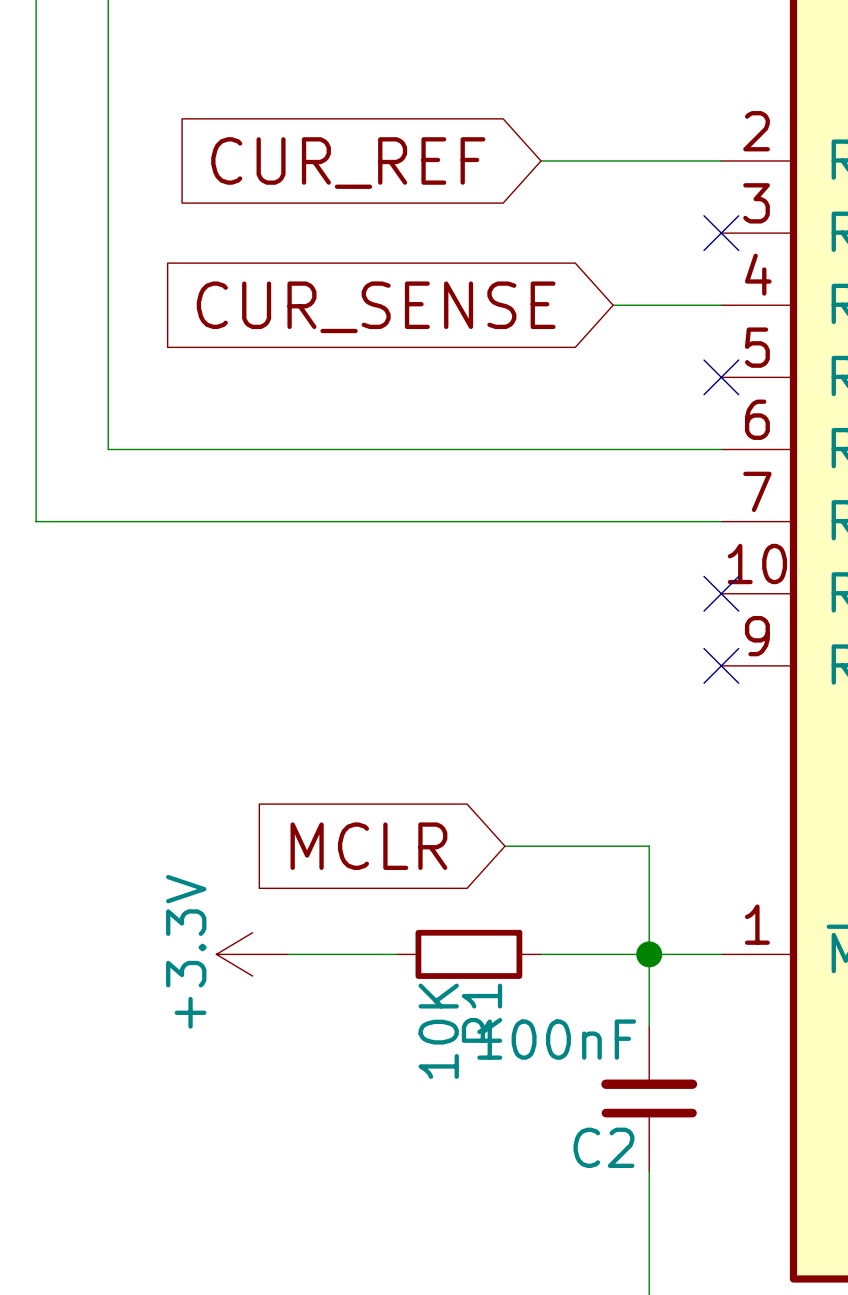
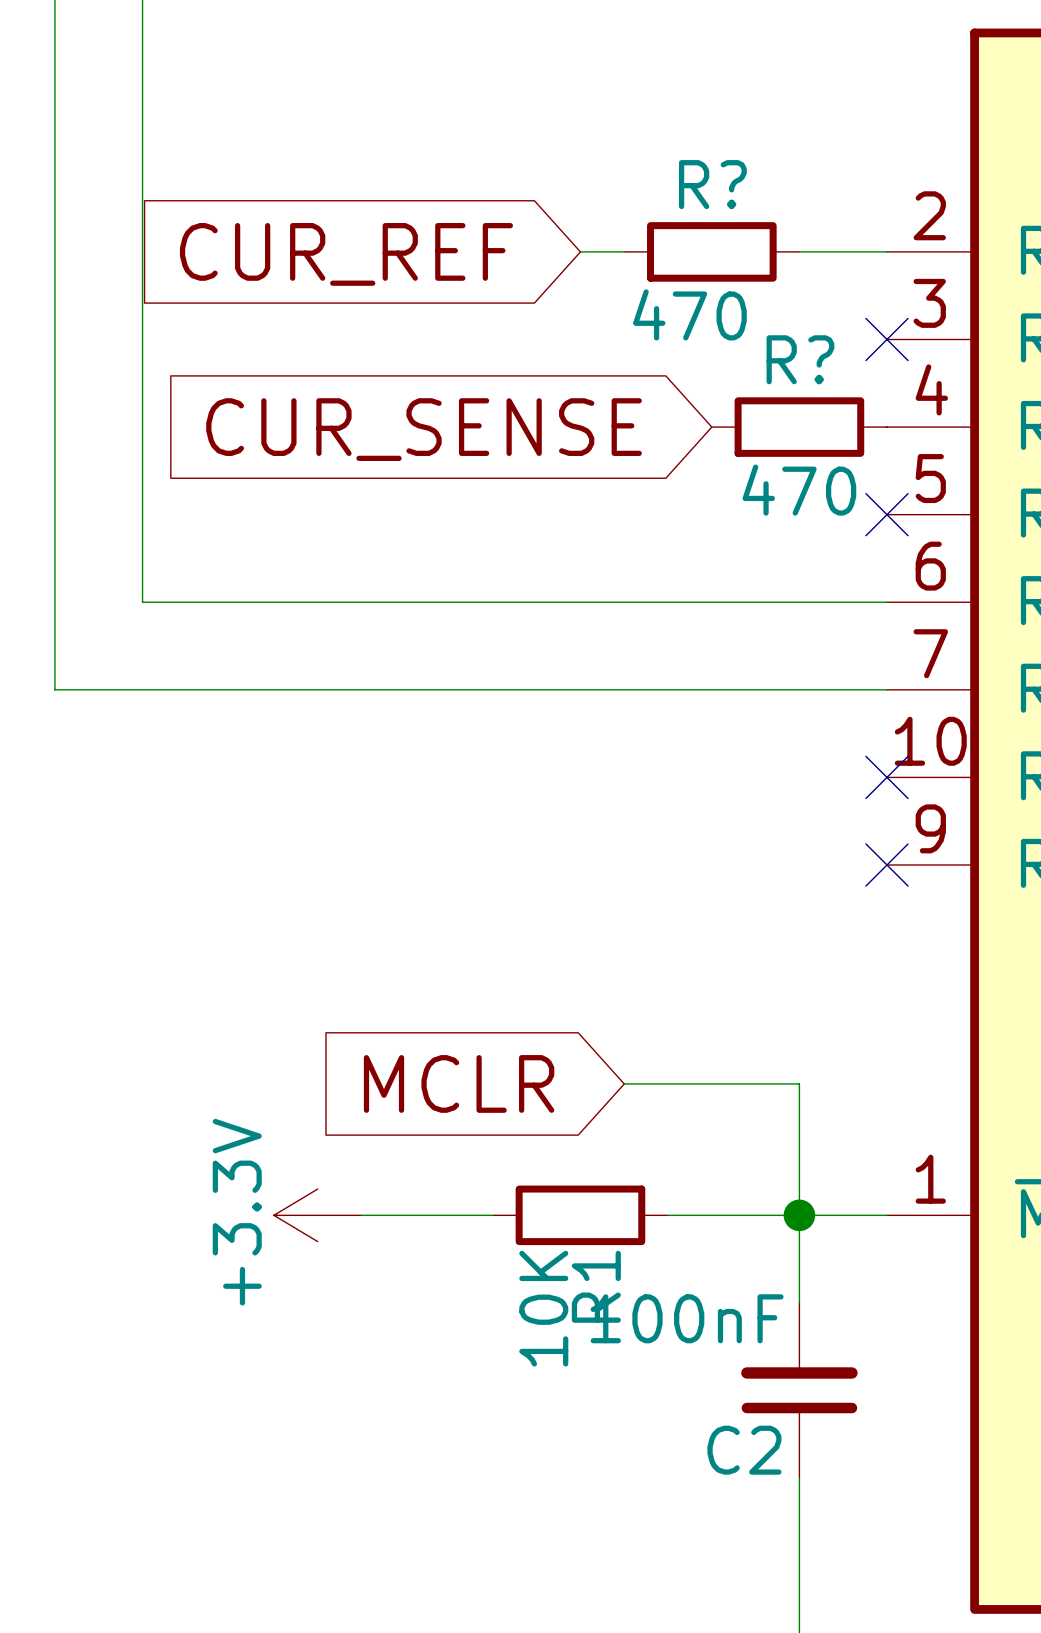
wire: none -> (580, 251) (624, 251)
wire: (541, 160) (649, 160) -> none
R?: none -> 470 (711, 251)
global label position: CUR_REF (348, 163) -> CUR_REF (346, 254)
wire: (613, 305) (721, 305) -> none
R?: none -> 470 (799, 427)
global label position: CUR_SENSE (376, 307) -> CUR_SENSE (424, 429)

